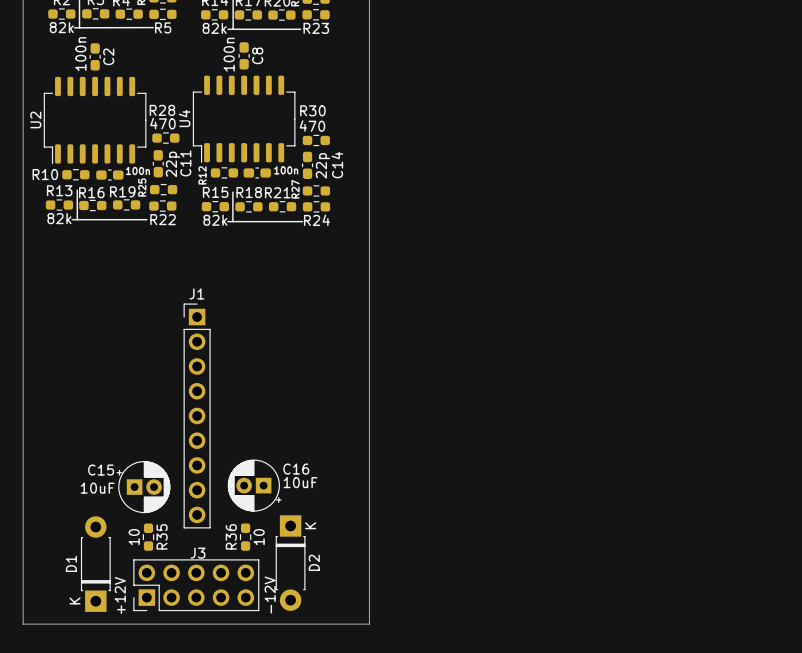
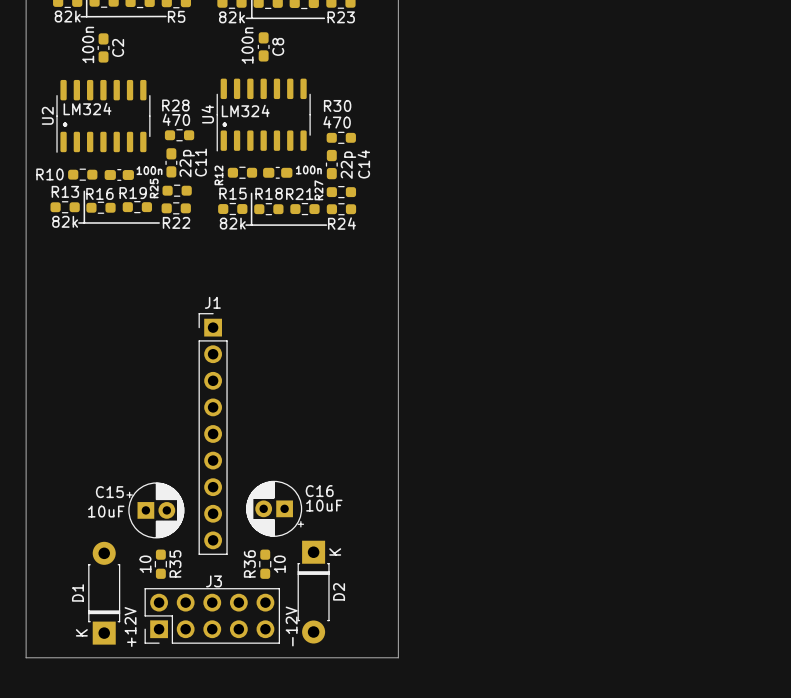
U4 footprint: [192, 75, 296, 163] -> [216, 78, 311, 152]
U2 footprint: [43, 76, 147, 165] -> [56, 79, 151, 153]
U2 value: none -> LM324 (87, 109)
U4 value: none -> LM324 (245, 110)
text: none -> . (65, 124)
text: none -> . (224, 124)

